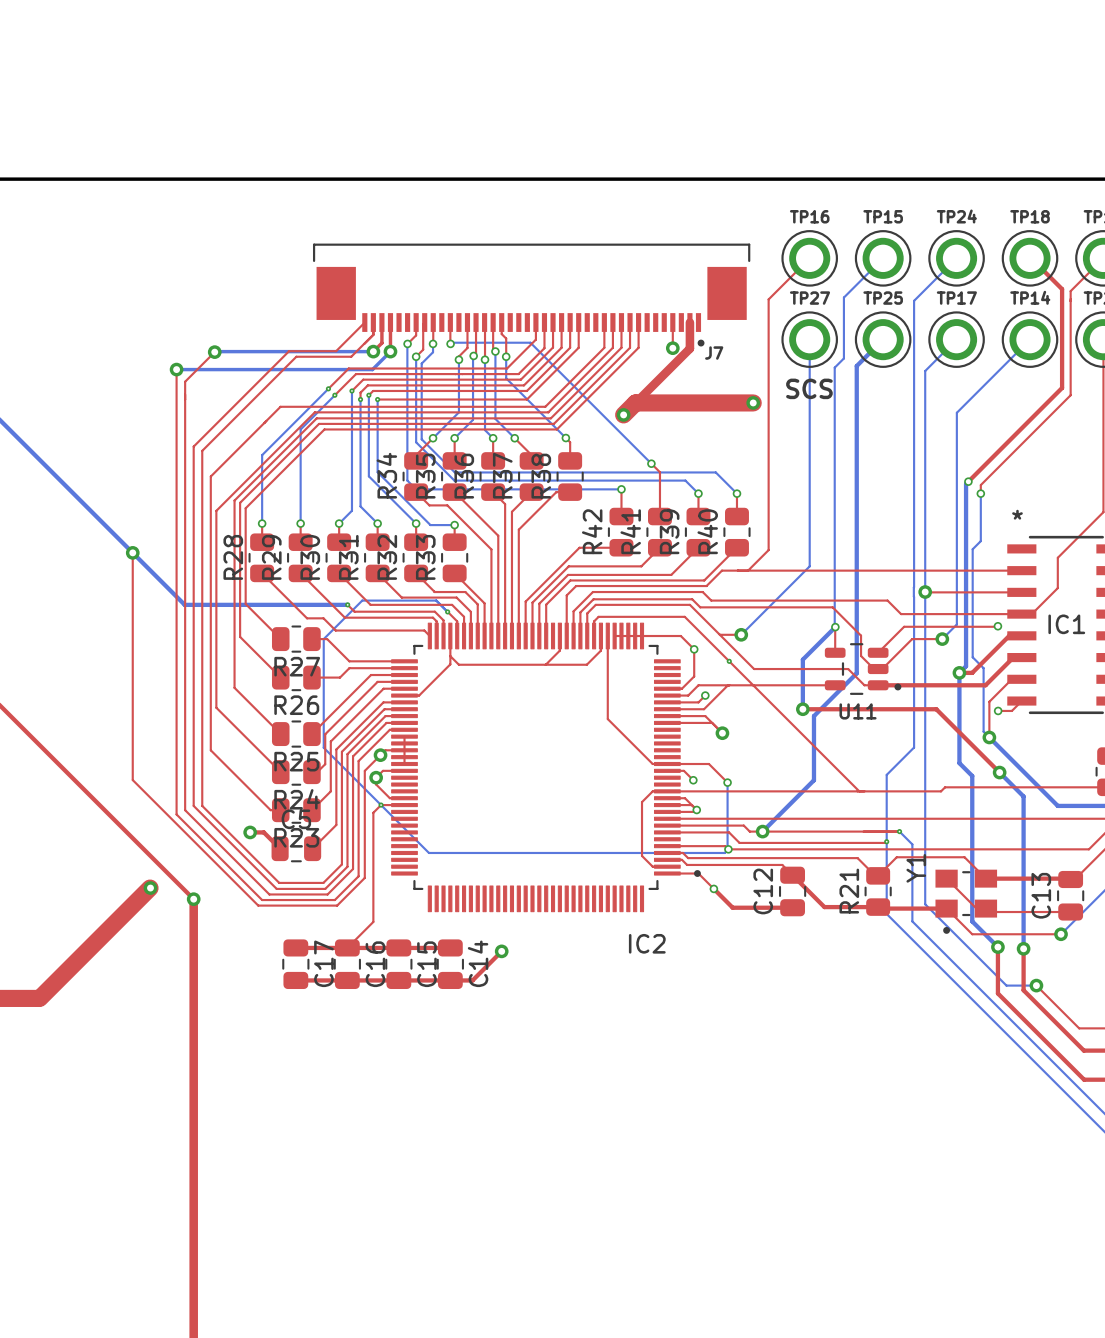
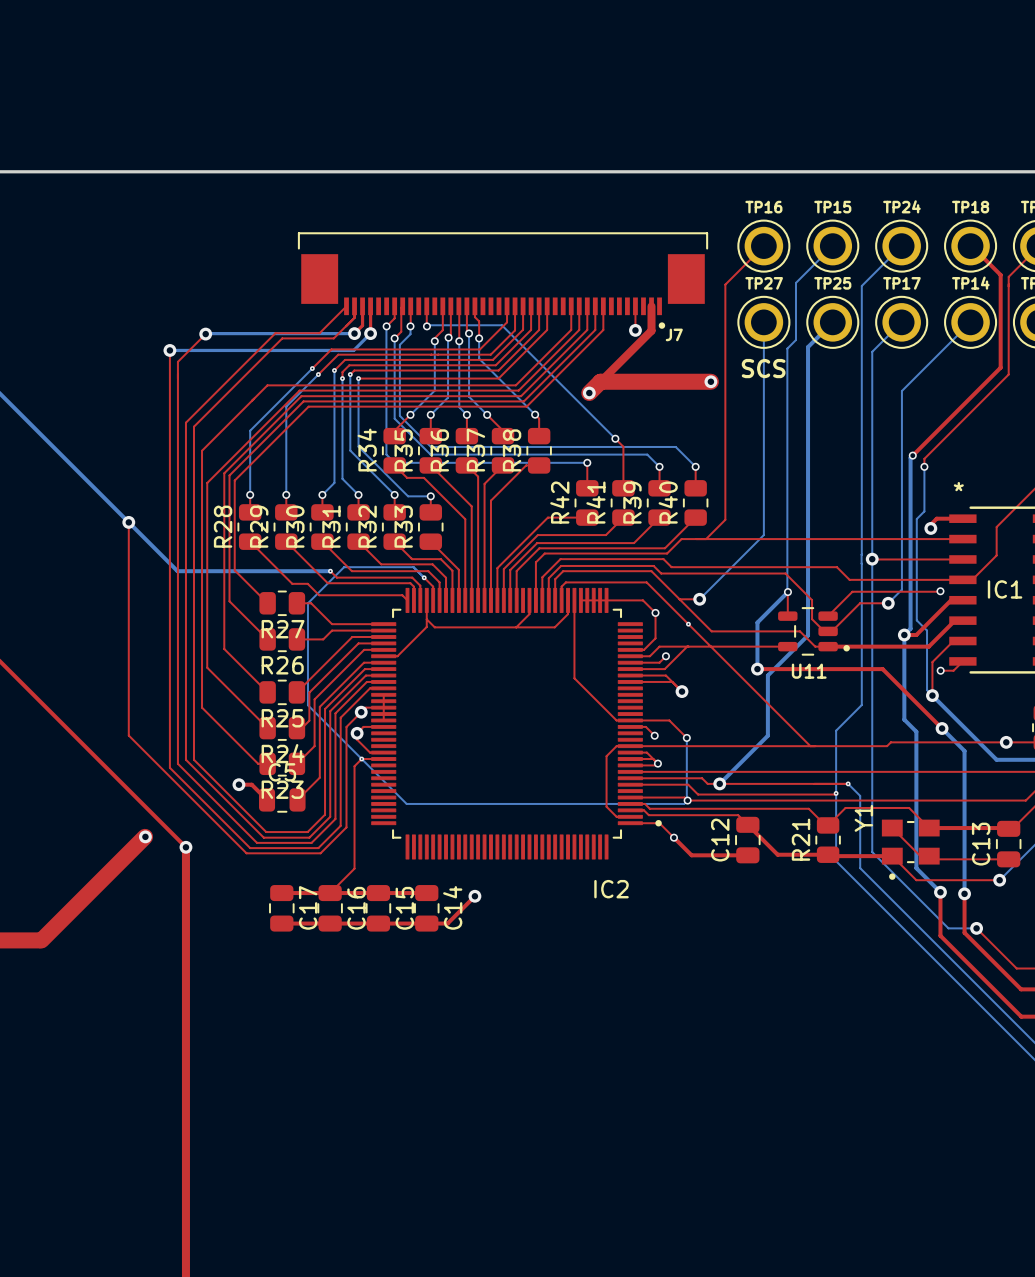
top track: none -> (962, 518) (936, 518) (930, 524) (930, 528)
via: none -> (930, 528)
via: none -> (1006, 742)

